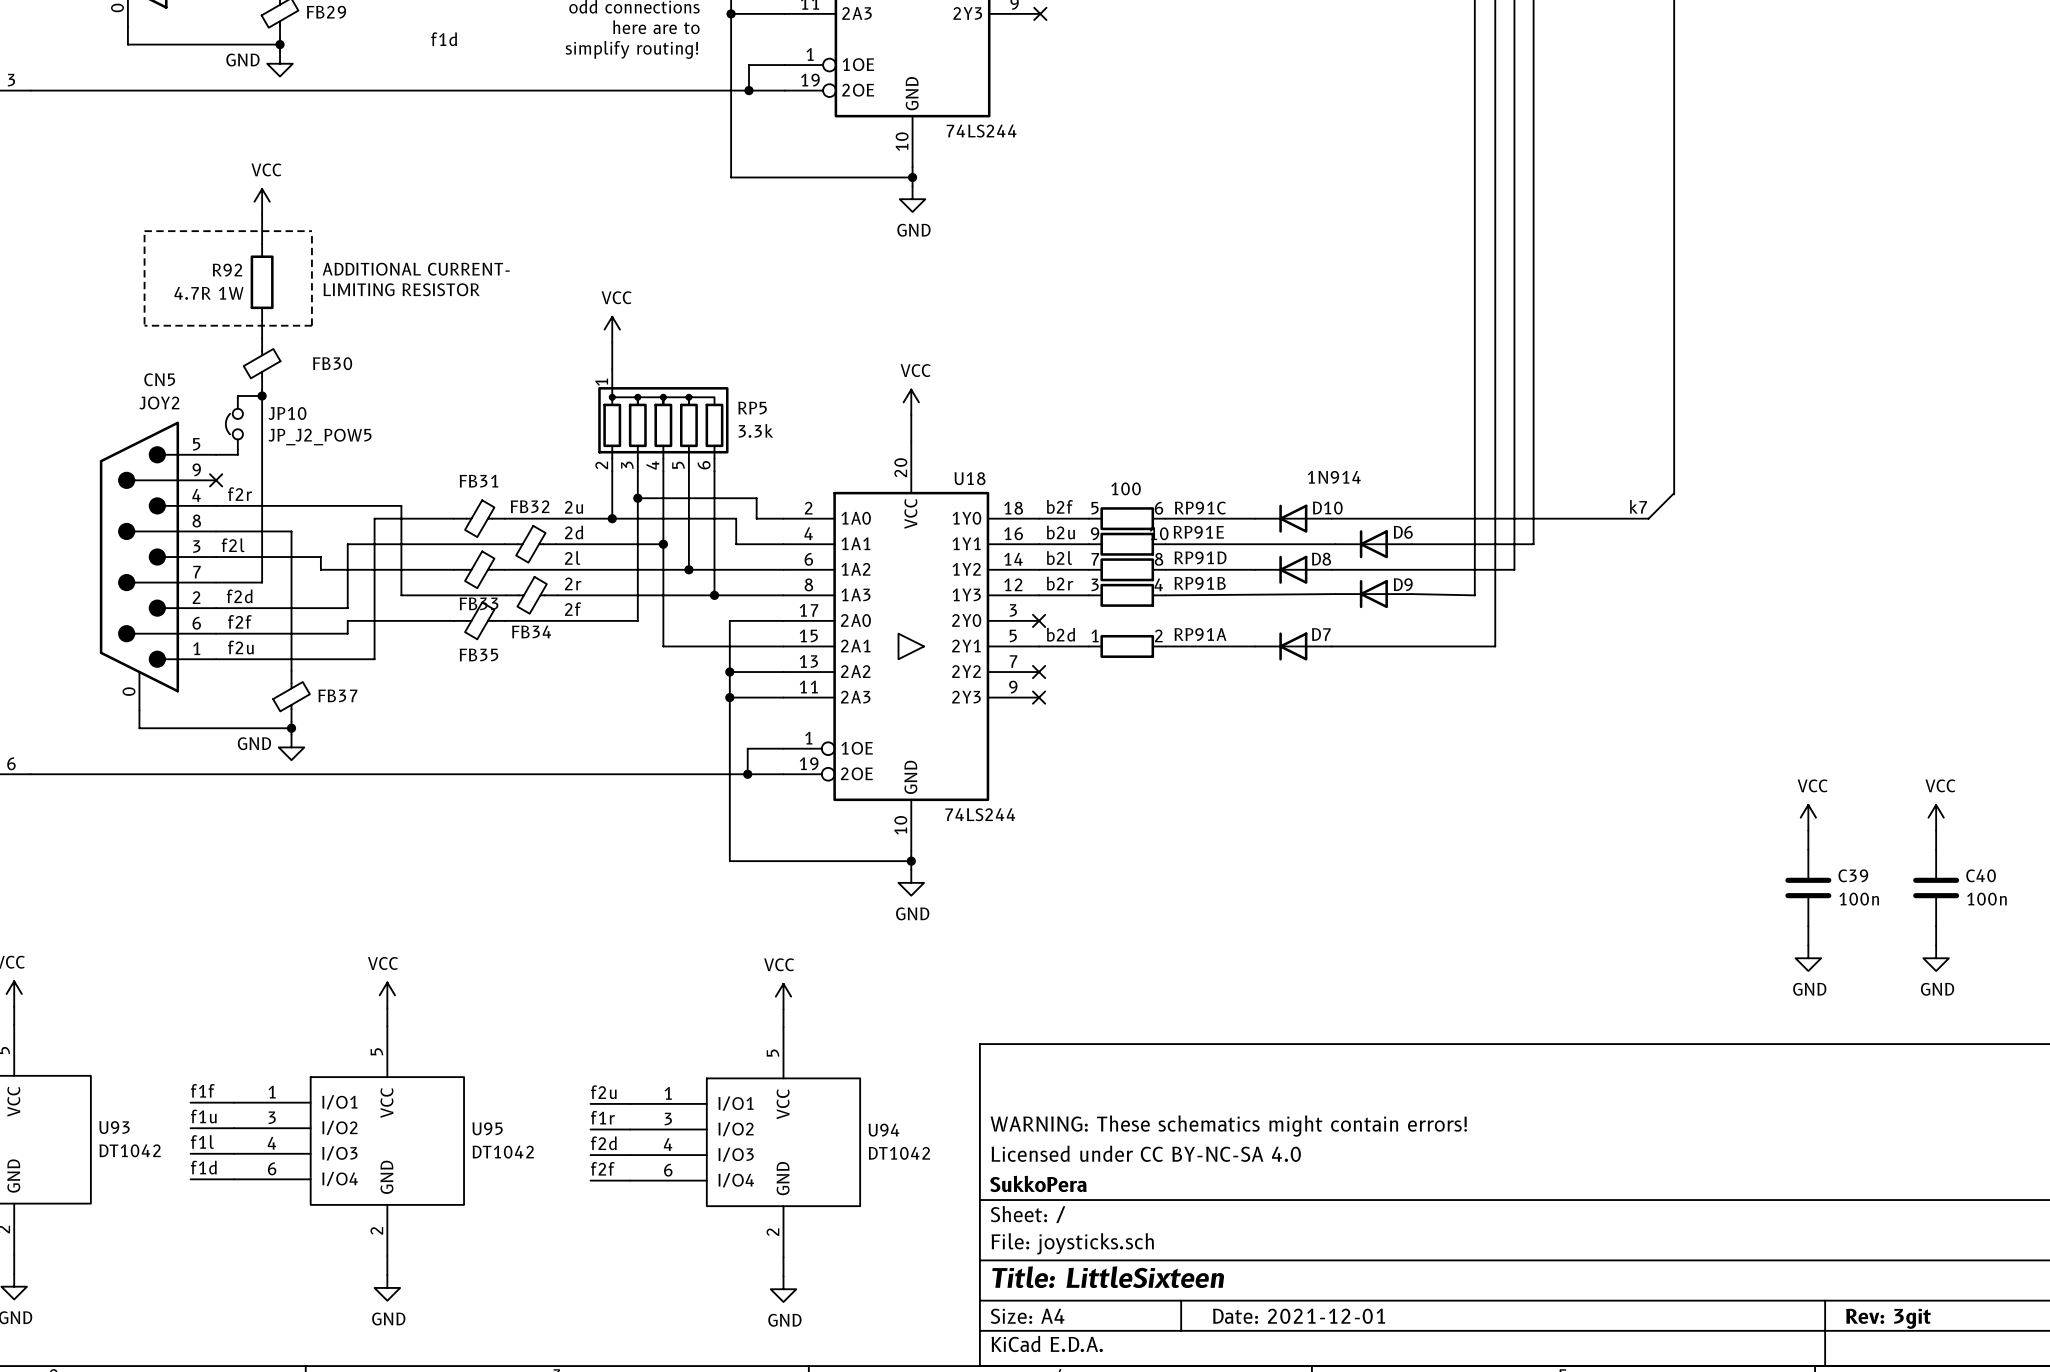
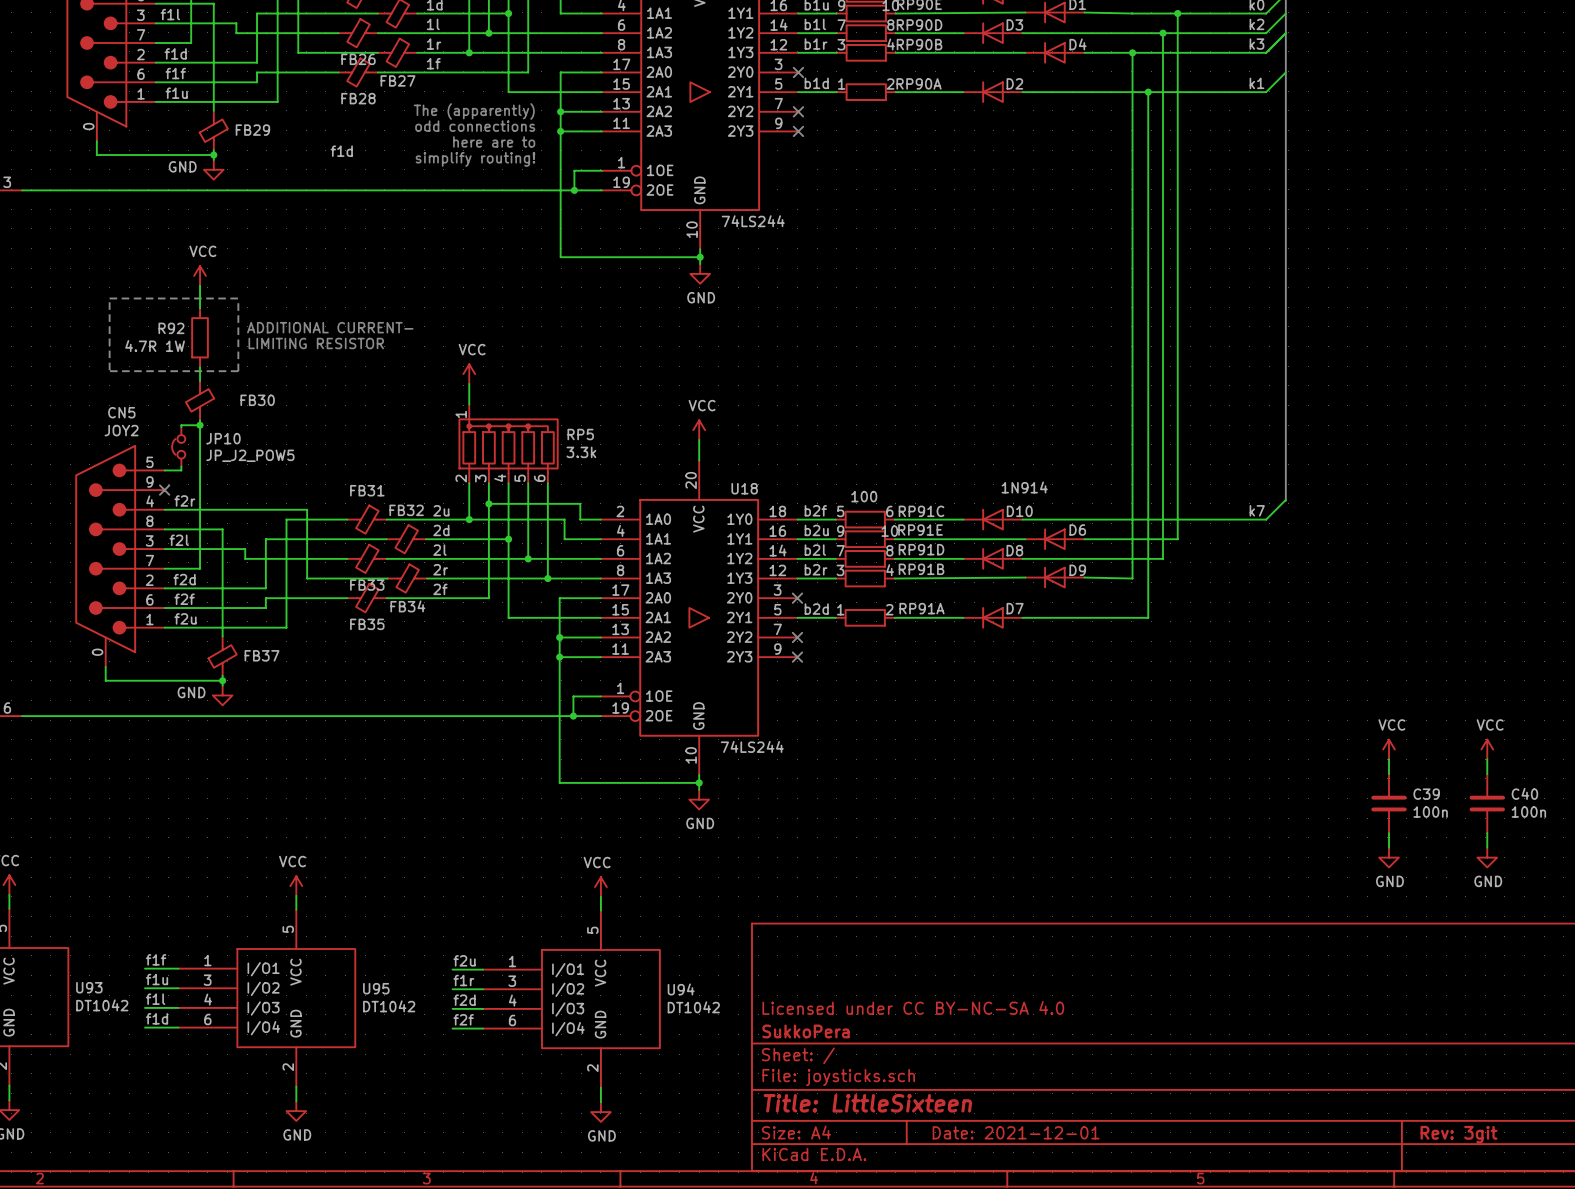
title block: WARNING: These schematics might contain errors! (1228, 1126) -> none

